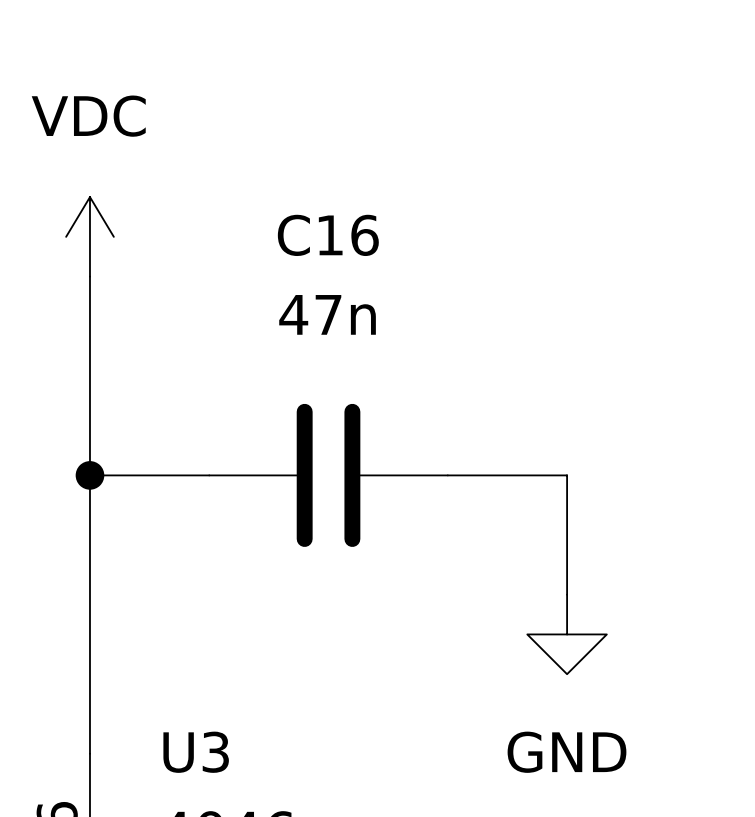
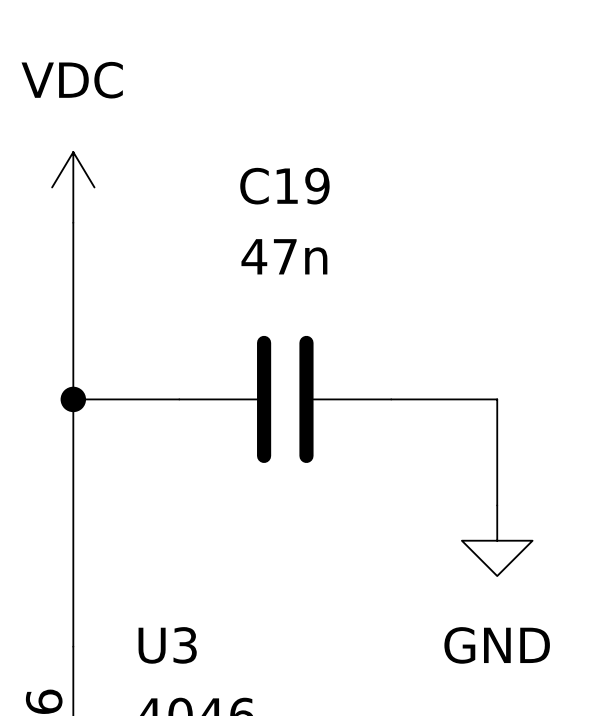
C16 name: C16 (328, 235) -> C19 (284, 186)

